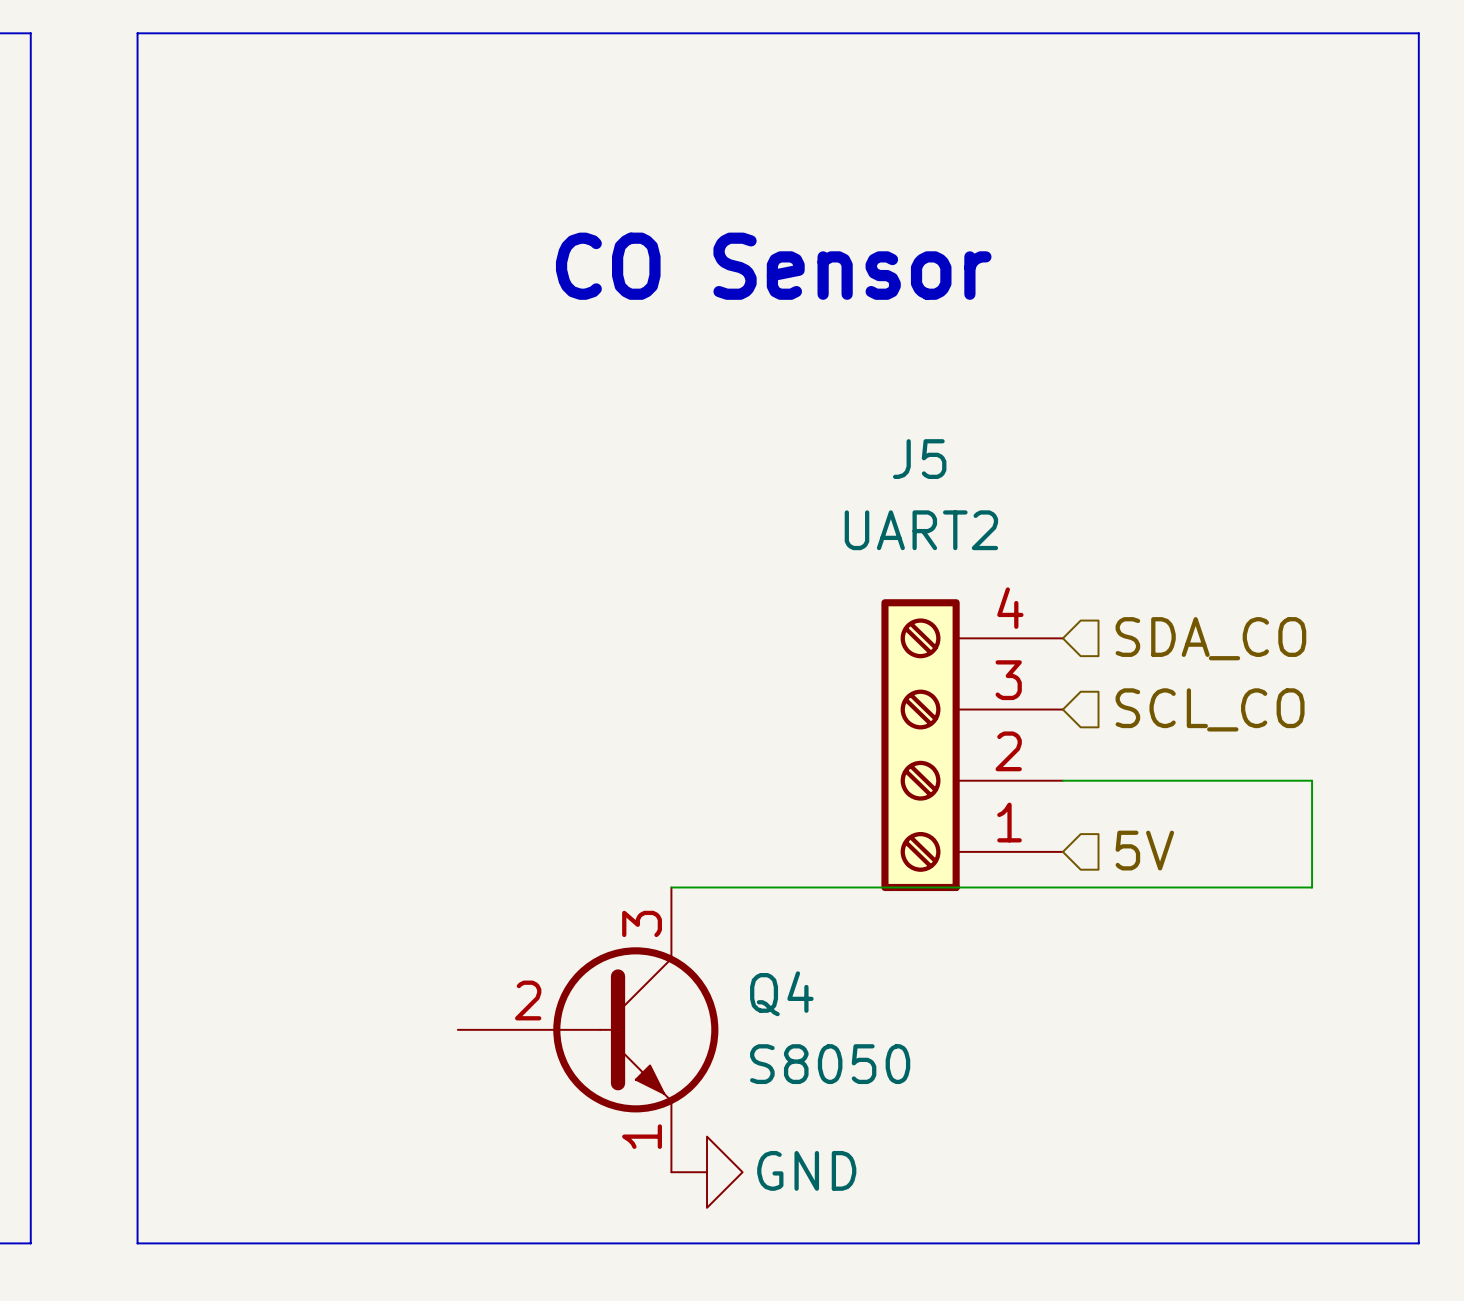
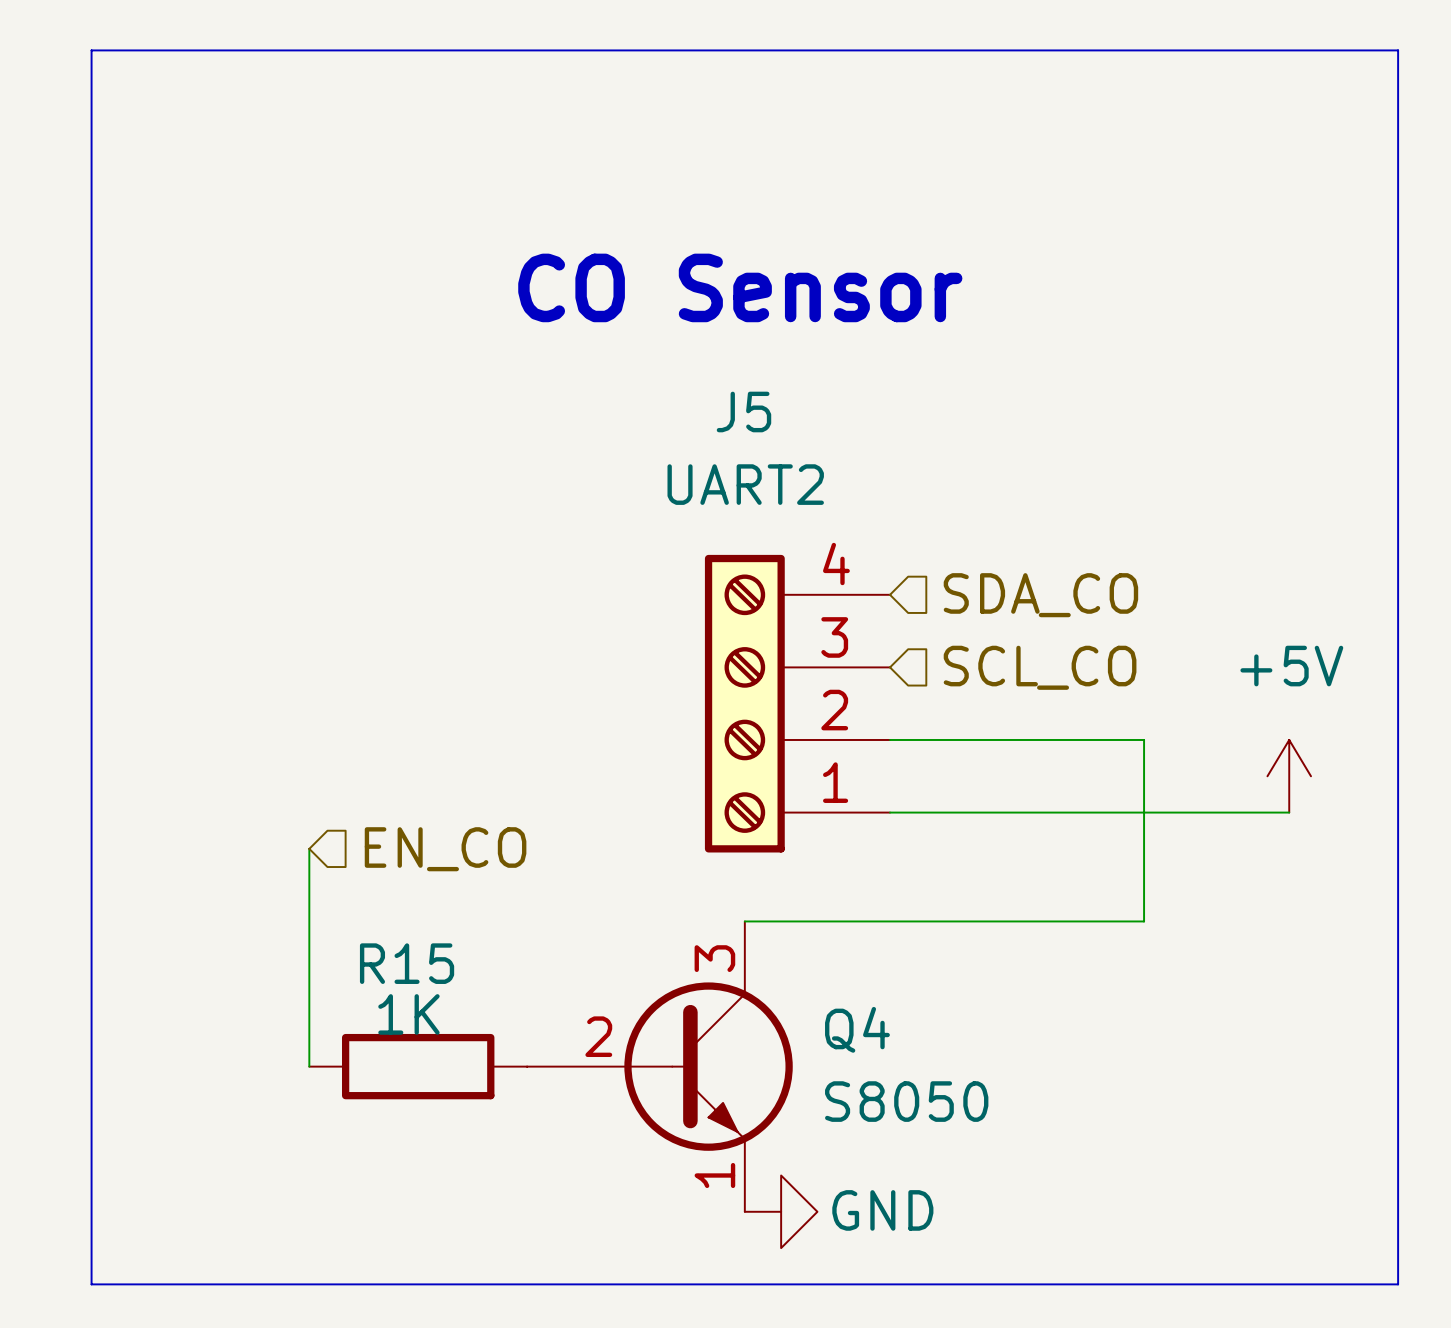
hierarchical label position: SDA_CO (1210, 638) -> SDA_CO (1040, 595)
hierarchical label position: SCL_CO (1210, 709) -> SCL_CO (1040, 667)
J5 position: (972, 745) -> (797, 703)
power symbol: none -> +5V (1289, 776)
wire: (1312, 780) (1312, 887) (1169, 887) -> (890, 739) (1144, 739) (1144, 921)
wire: none -> (309, 848) (309, 1066)
hierarchical label: none -> EN_CO (445, 849)
hierarchical label: 5V (1144, 850) -> none
wire: (671, 887) (778, 887) -> none
R15: none -> 1K (418, 1066)
Q4 position: (588, 1029) -> (659, 1066)
power symbol position: GND (707, 1172) -> GND (781, 1211)

